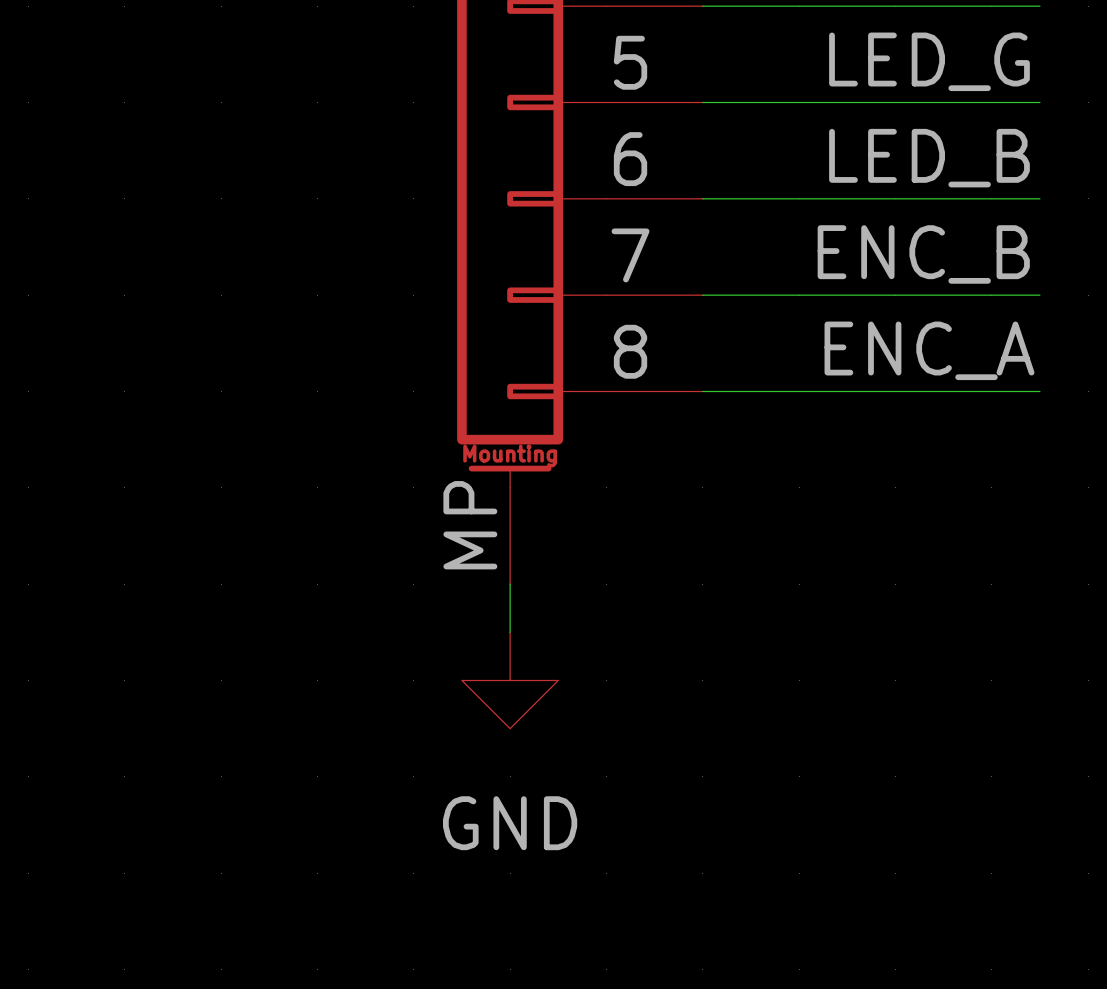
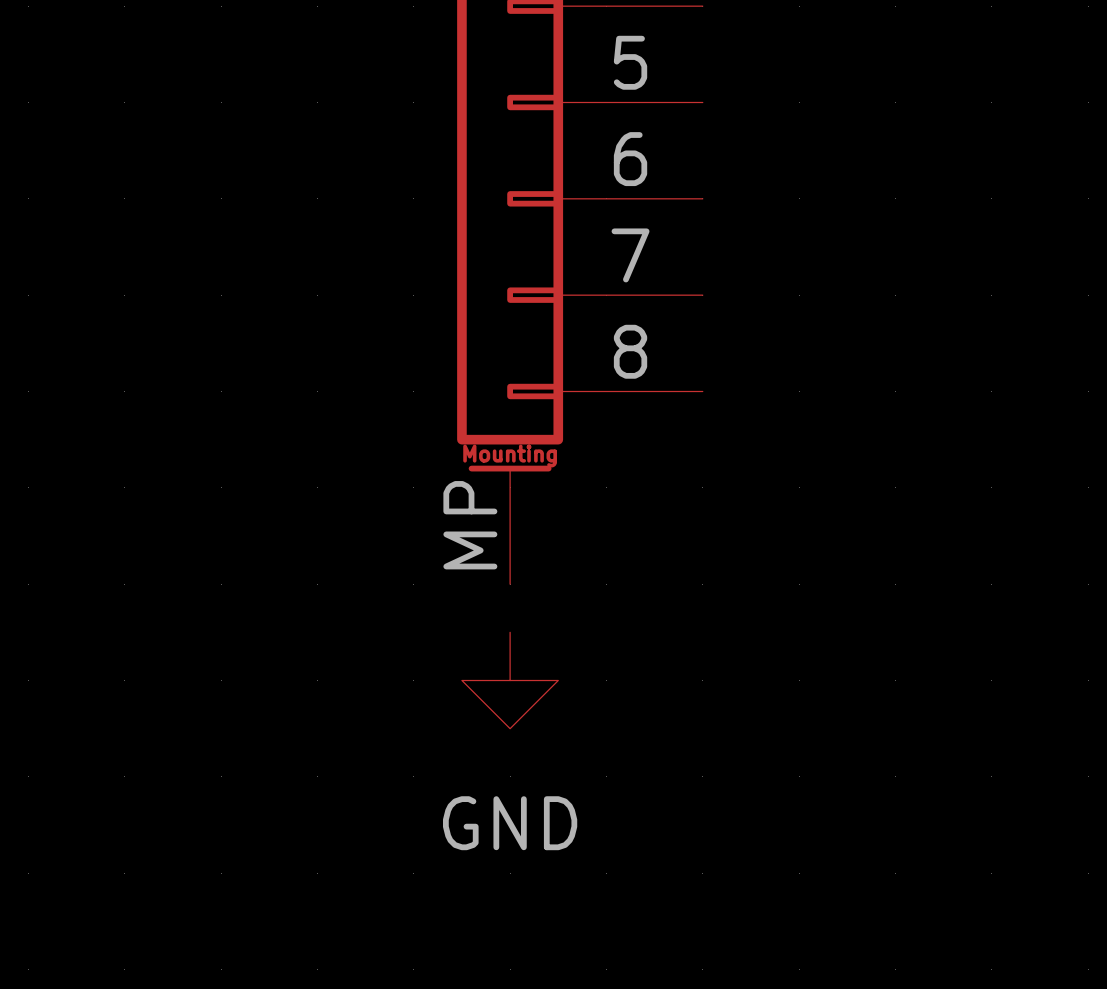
wire: (702, 6) (1039, 6) -> none
label: LED_G (929, 61) -> none
wire: (702, 102) (1039, 102) -> none
label: LED_B (929, 158) -> none
wire: (702, 198) (1039, 198) -> none
label: ENC_B (923, 254) -> none
wire: (702, 295) (1039, 295) -> none
label: ENC_A (929, 350) -> none
wire: (702, 391) (1039, 391) -> none
wire: (510, 584) (510, 632) -> none

